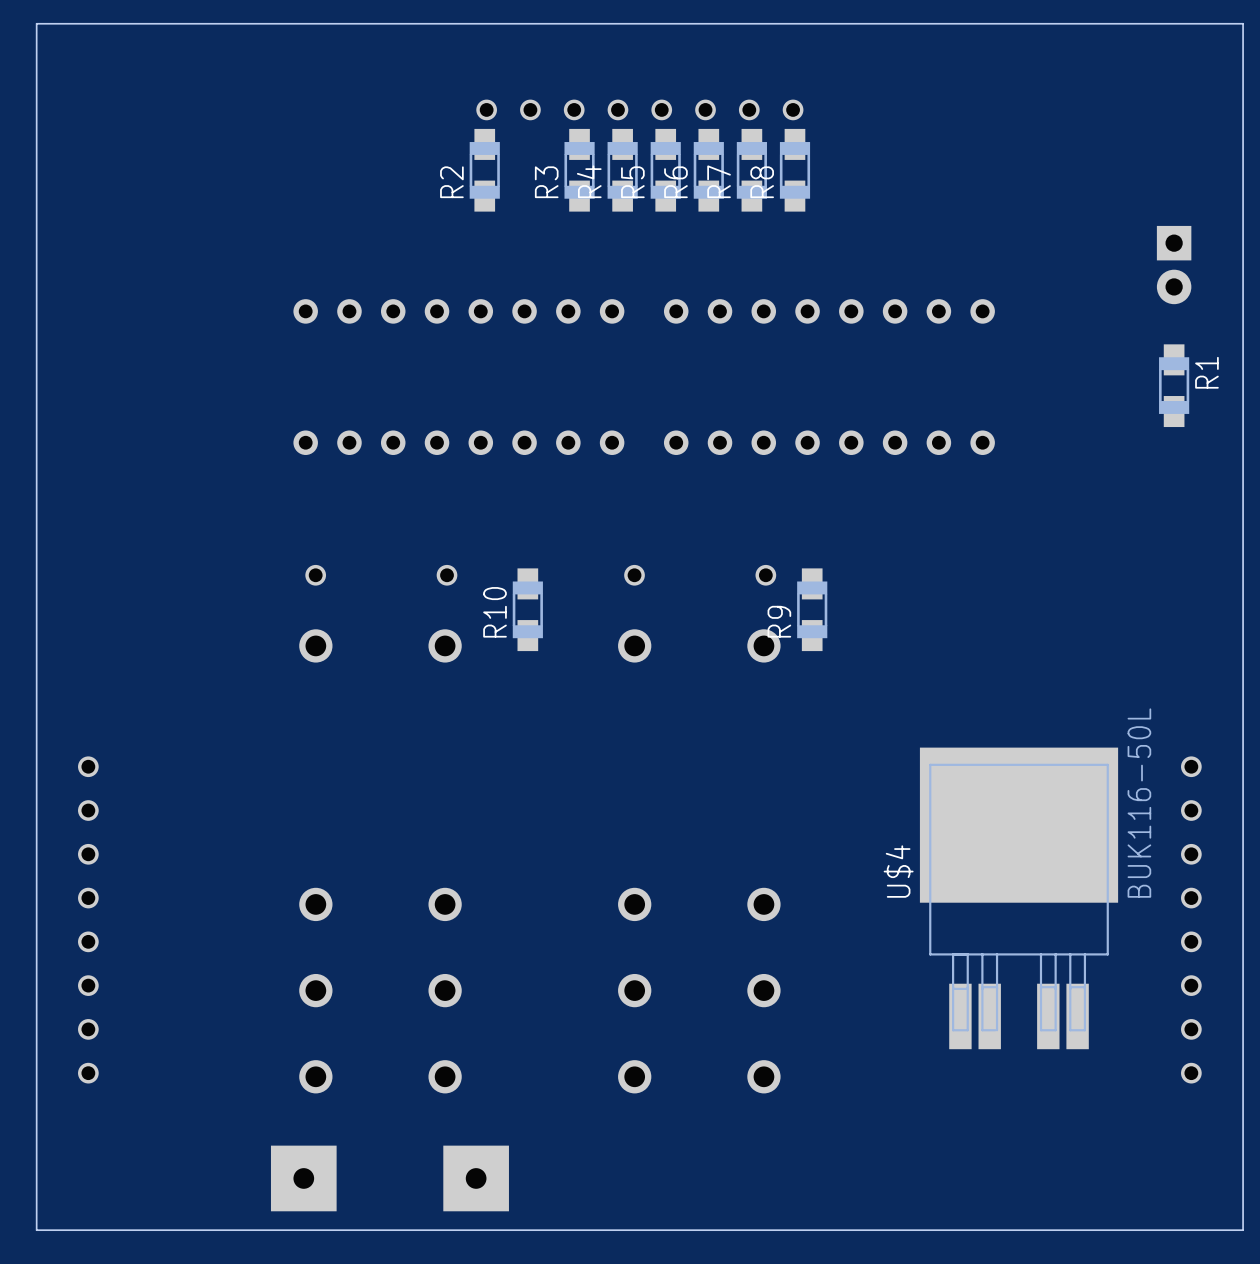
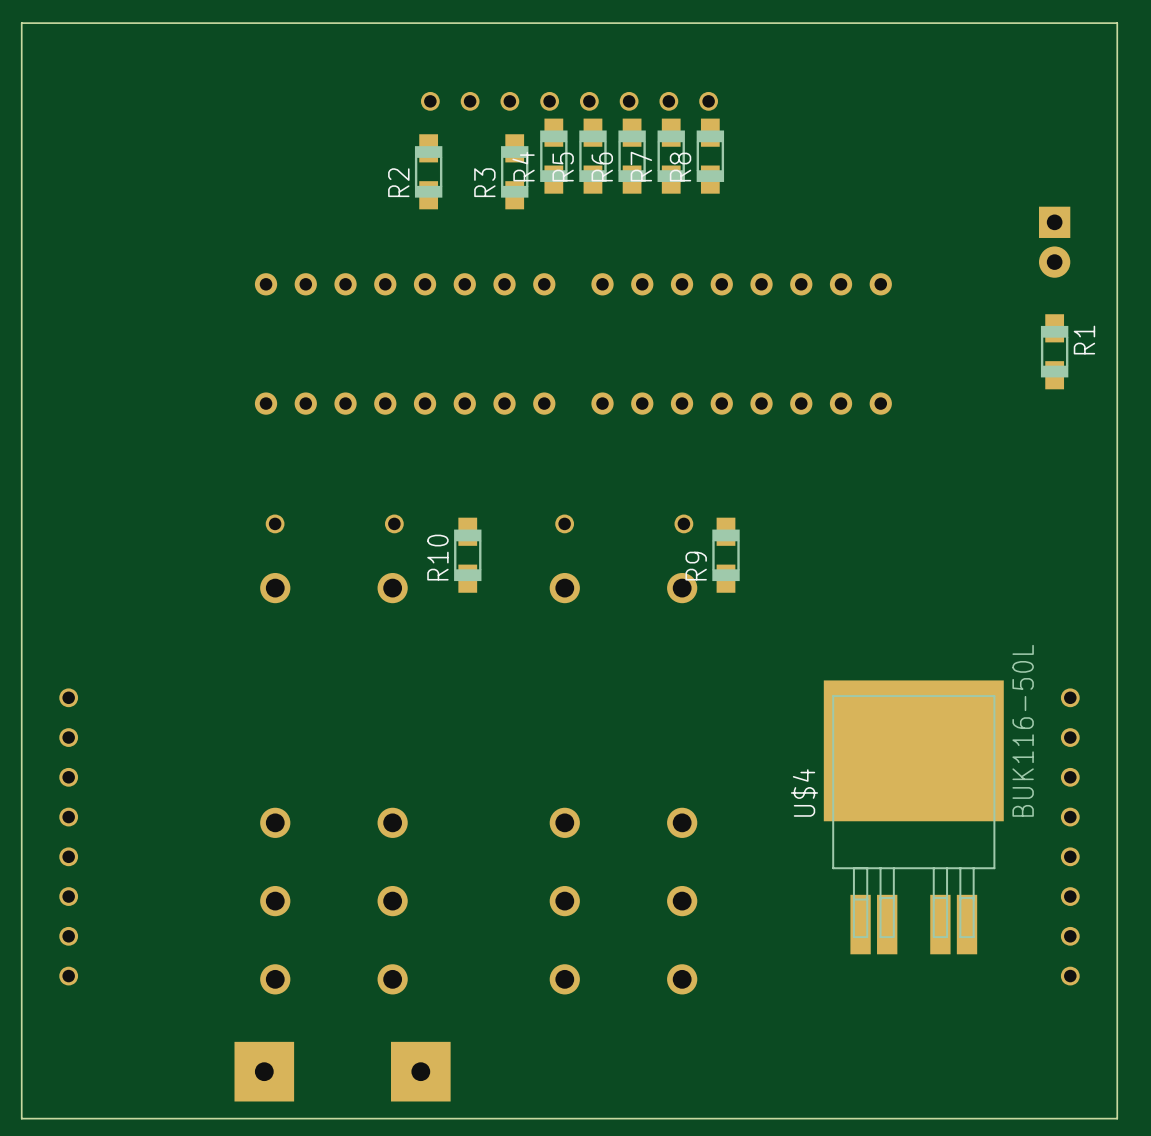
R2 position: (484, 170) -> (428, 171)
R3 position: (579, 170) -> (514, 171)

